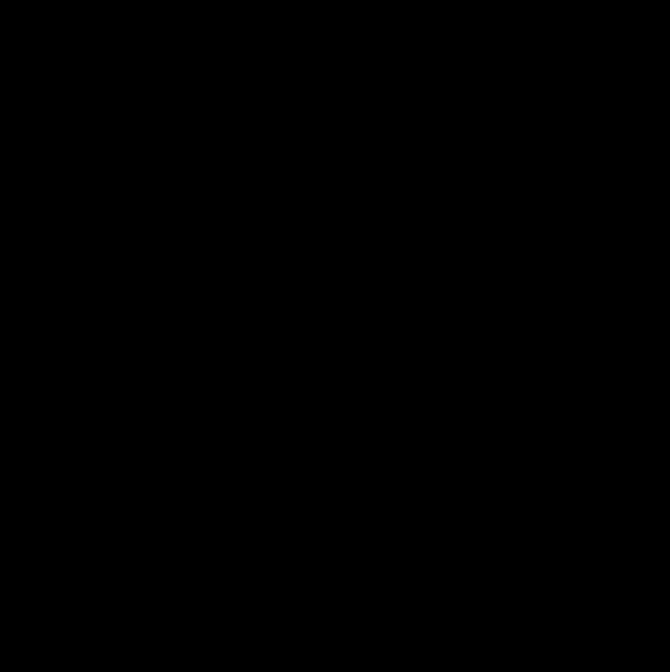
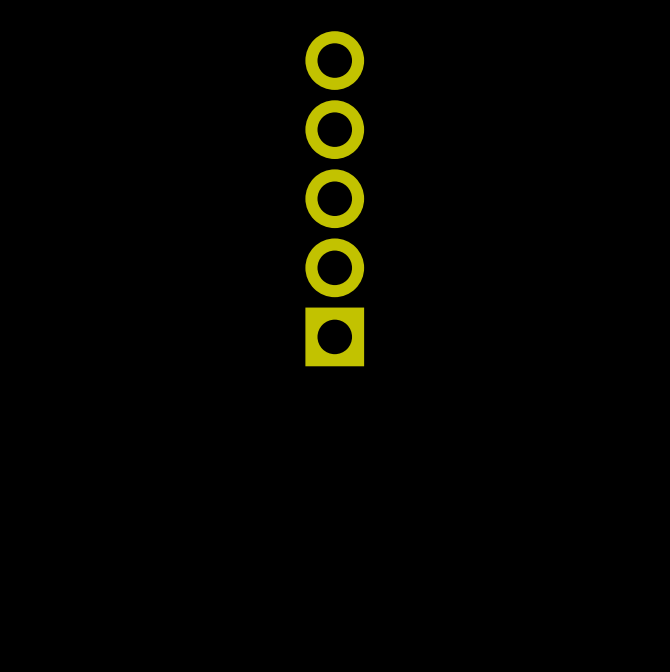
part: none -> (334, 198)

